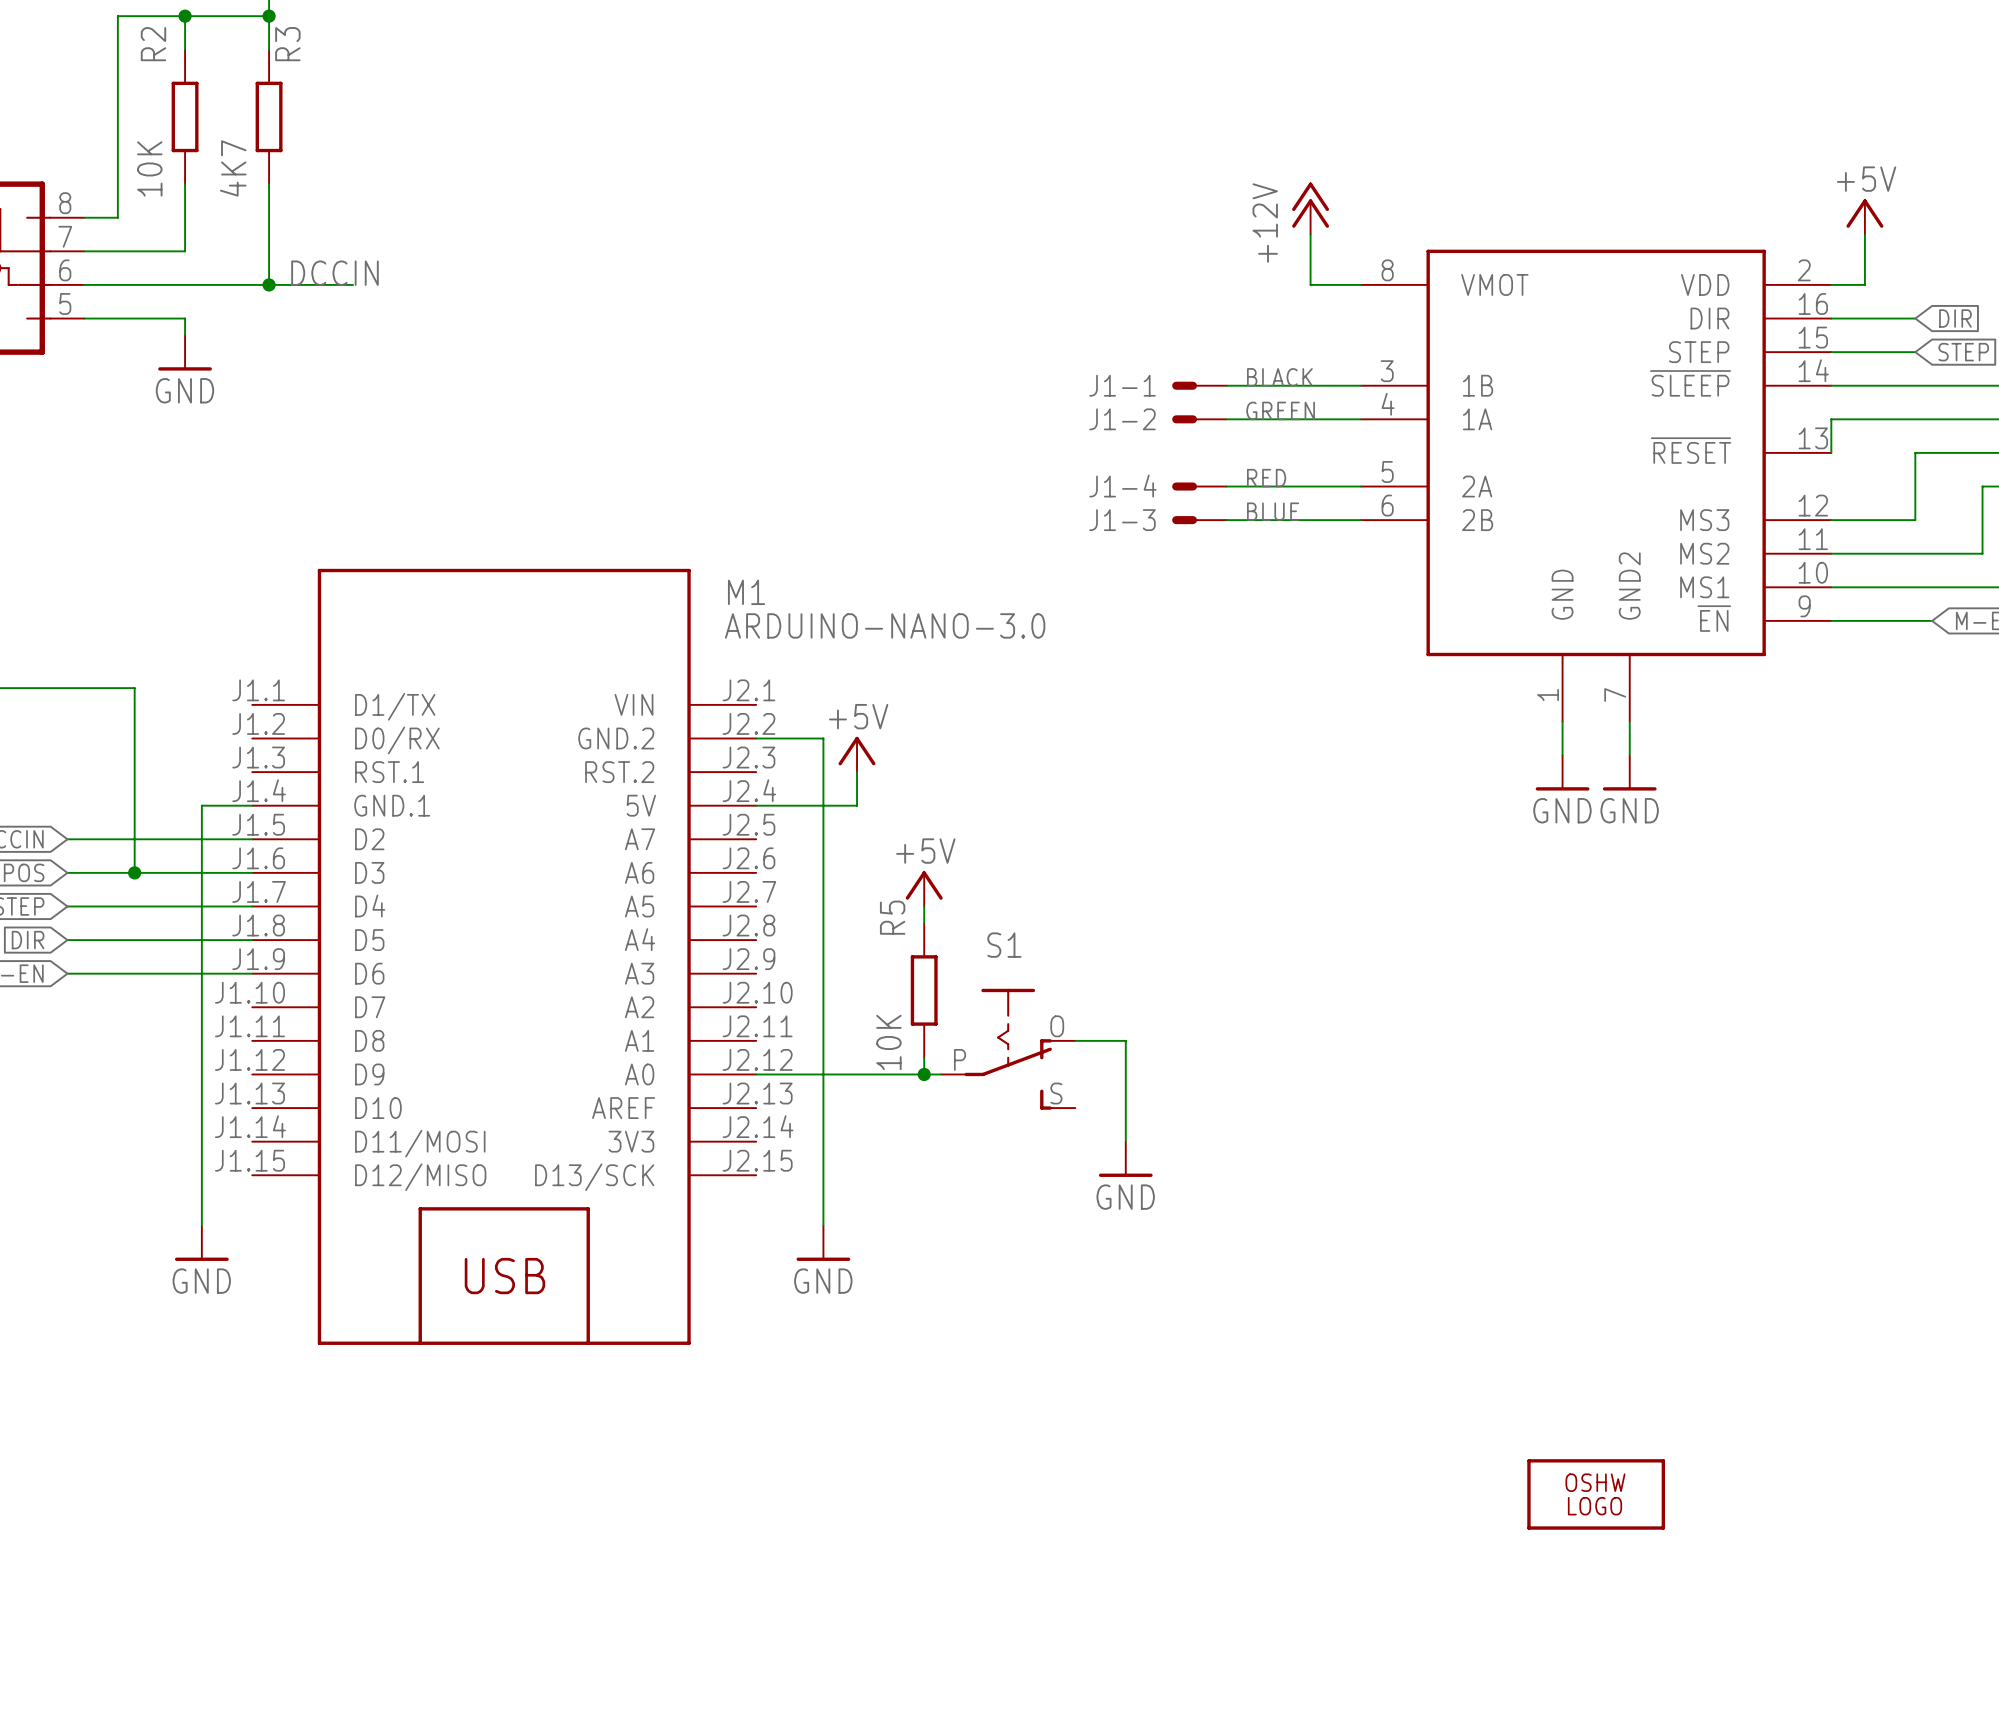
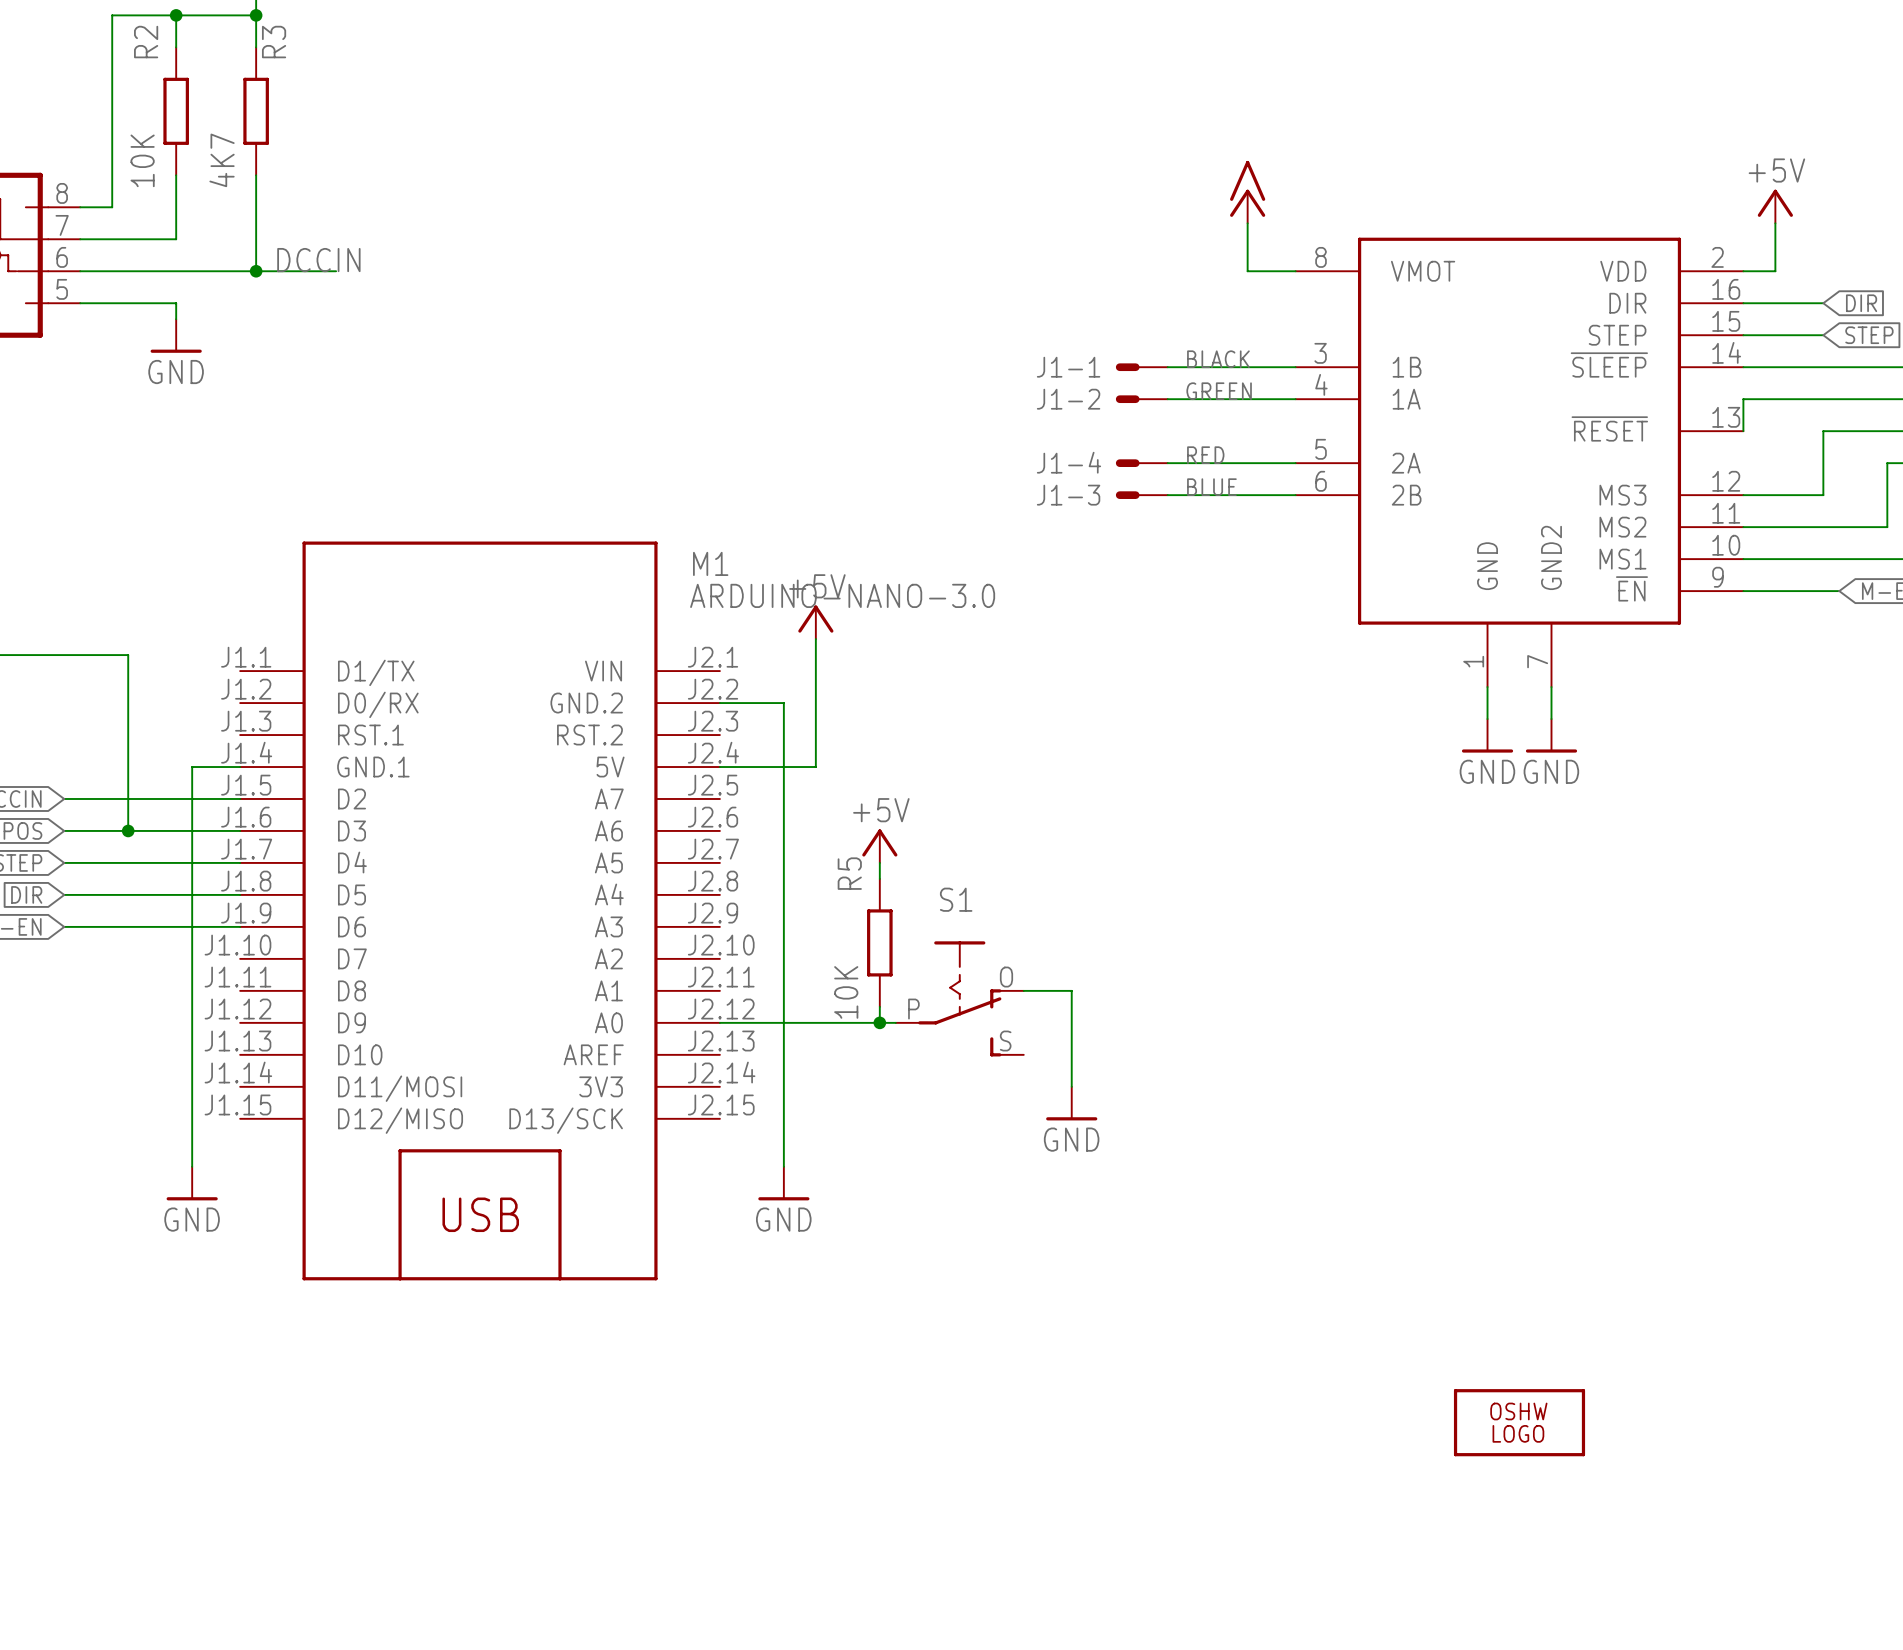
power symbol shape: [1292, 182, 1330, 235] -> [1230, 160, 1266, 224]
power symbol text: +12V (1265, 223) -> none
wire: none -> (815, 639) (815, 735)
power symbol position: +5V (857, 754) -> +5V (815, 622)

